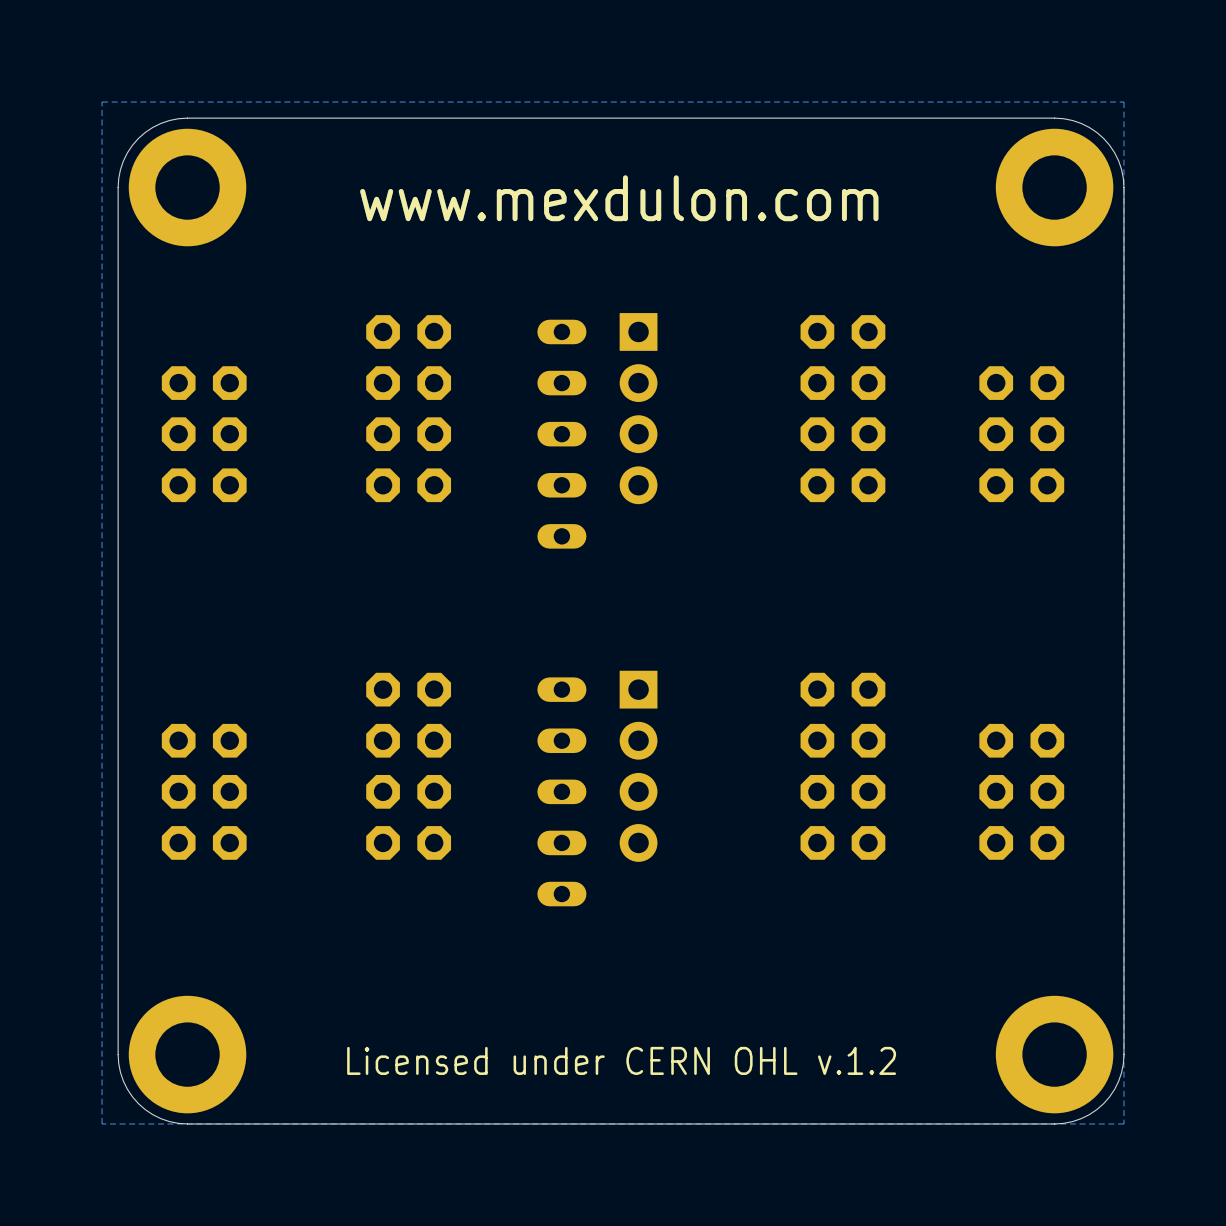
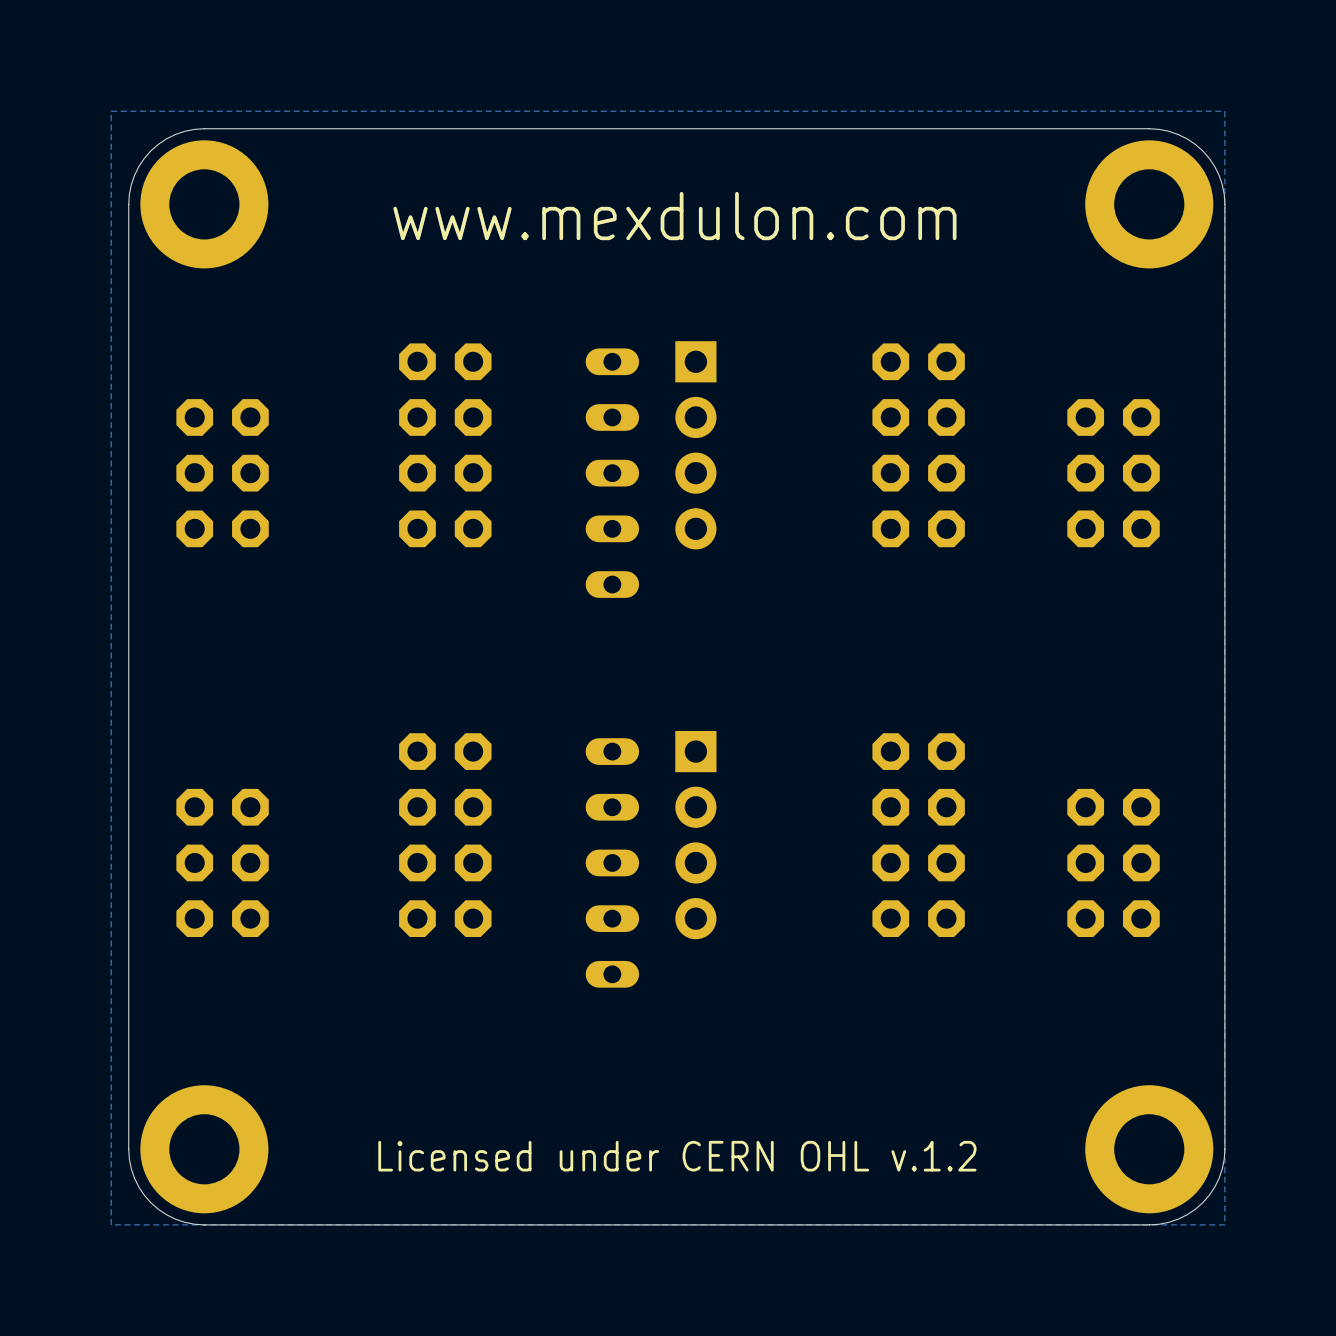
text: www.mexdulon.com (619, 198) -> none
text: none -> www.mexdulon.com (674, 216)

